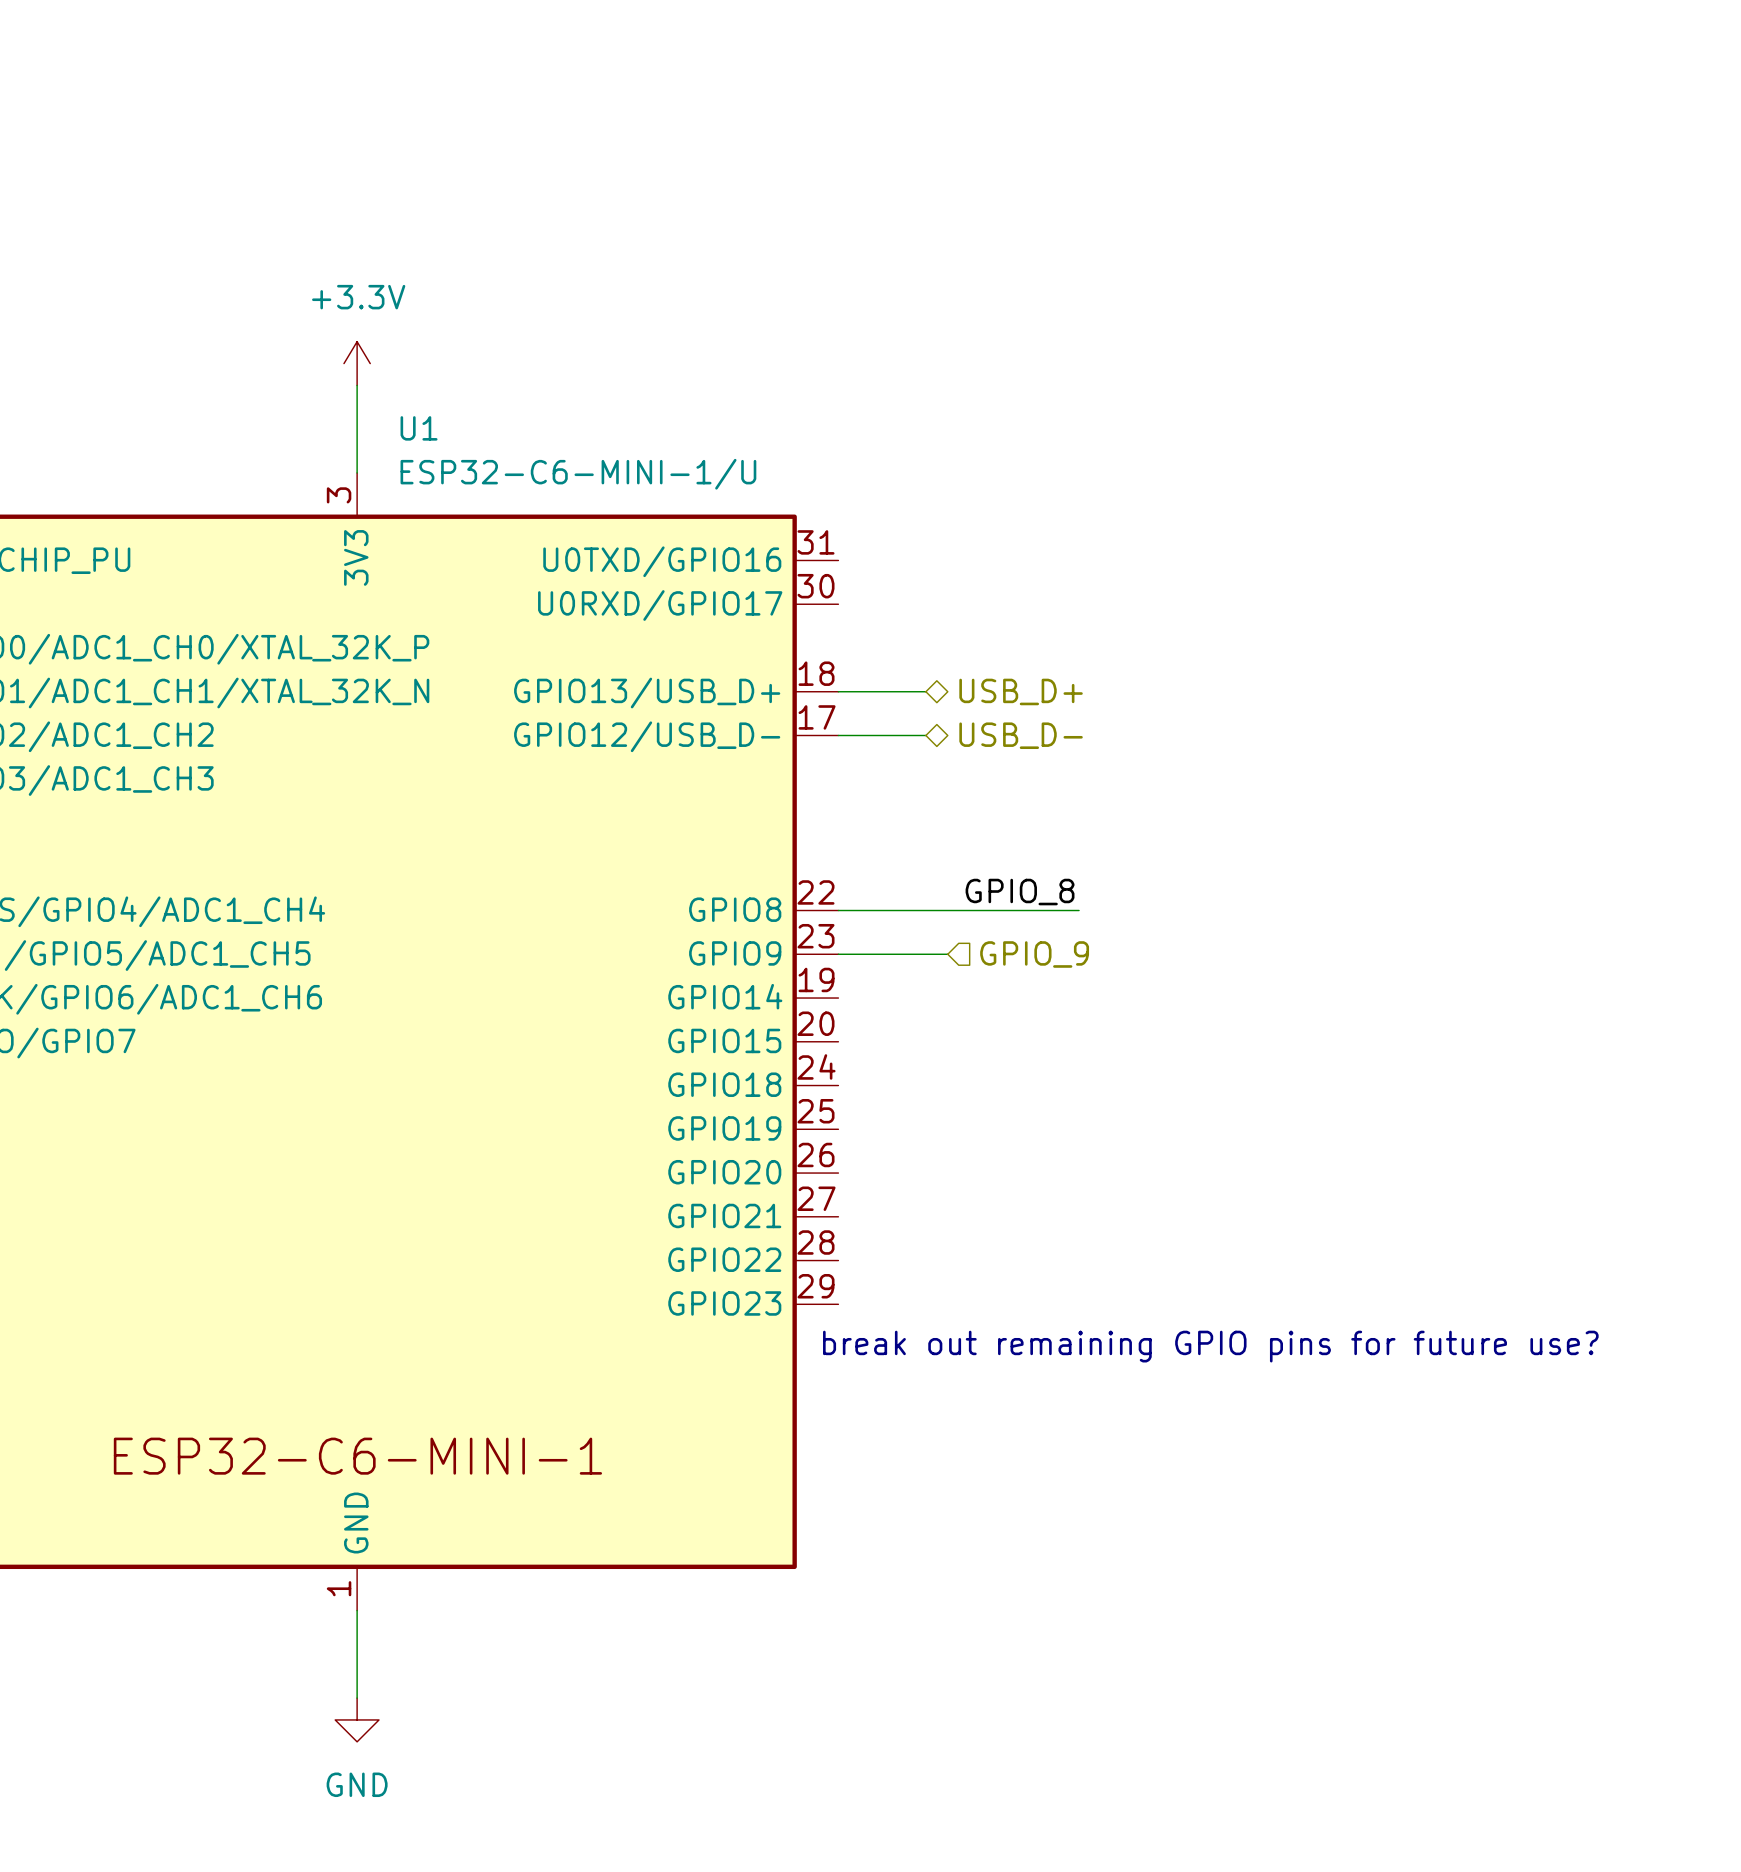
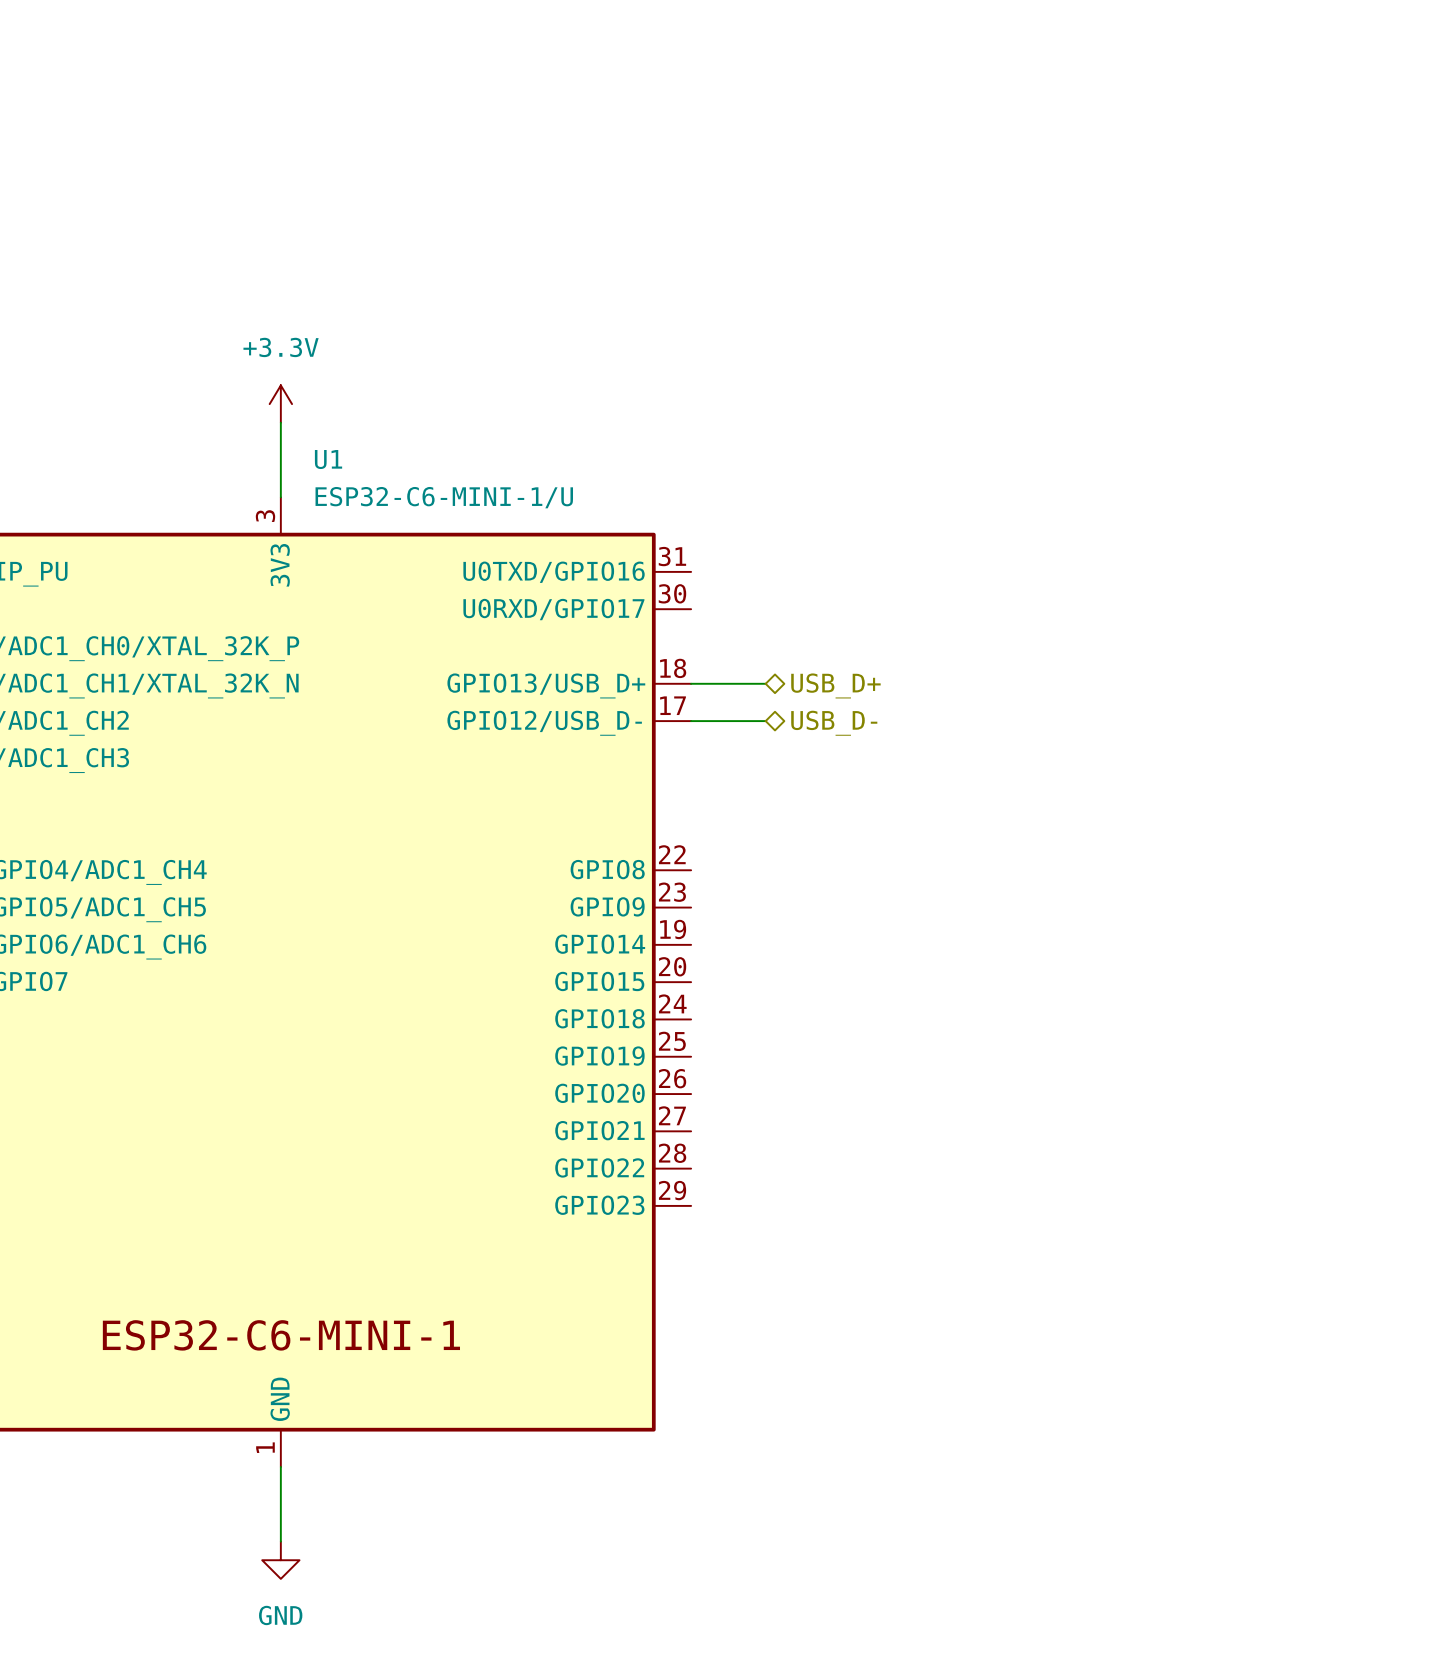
label: GPIO_8 (1020, 892) -> none
wire: (838, 910) (1079, 910) -> none
wire: (838, 954) (947, 954) -> none
hierarchical label: GPIO_9 (1034, 954) -> none
text: break out remaining GPIO pins for future use? (1210, 1346) -> none

